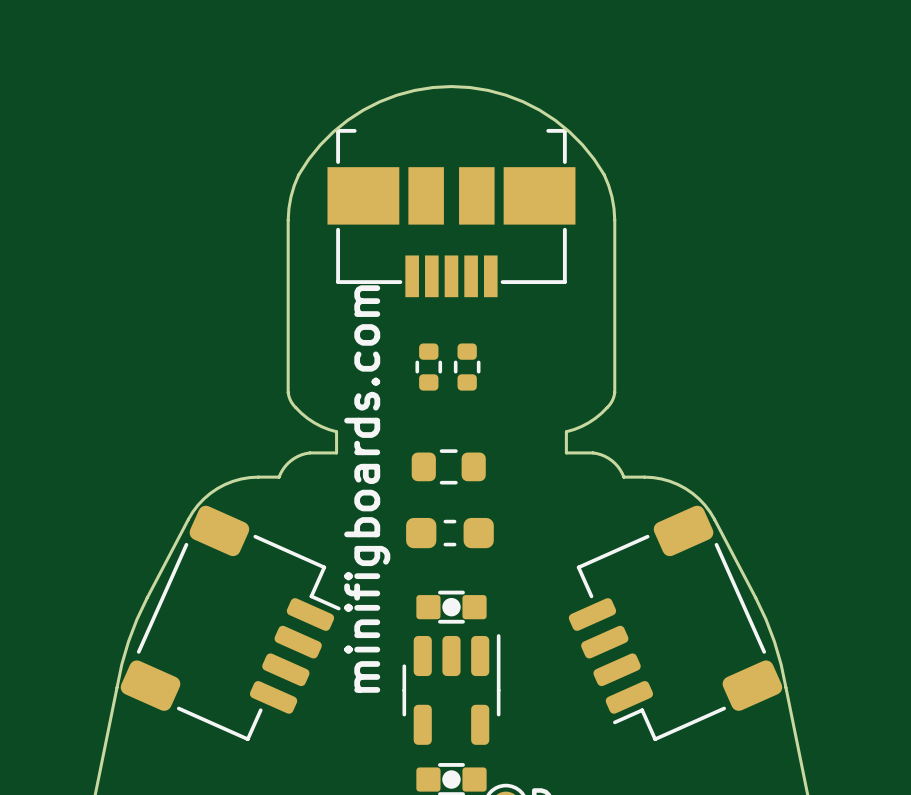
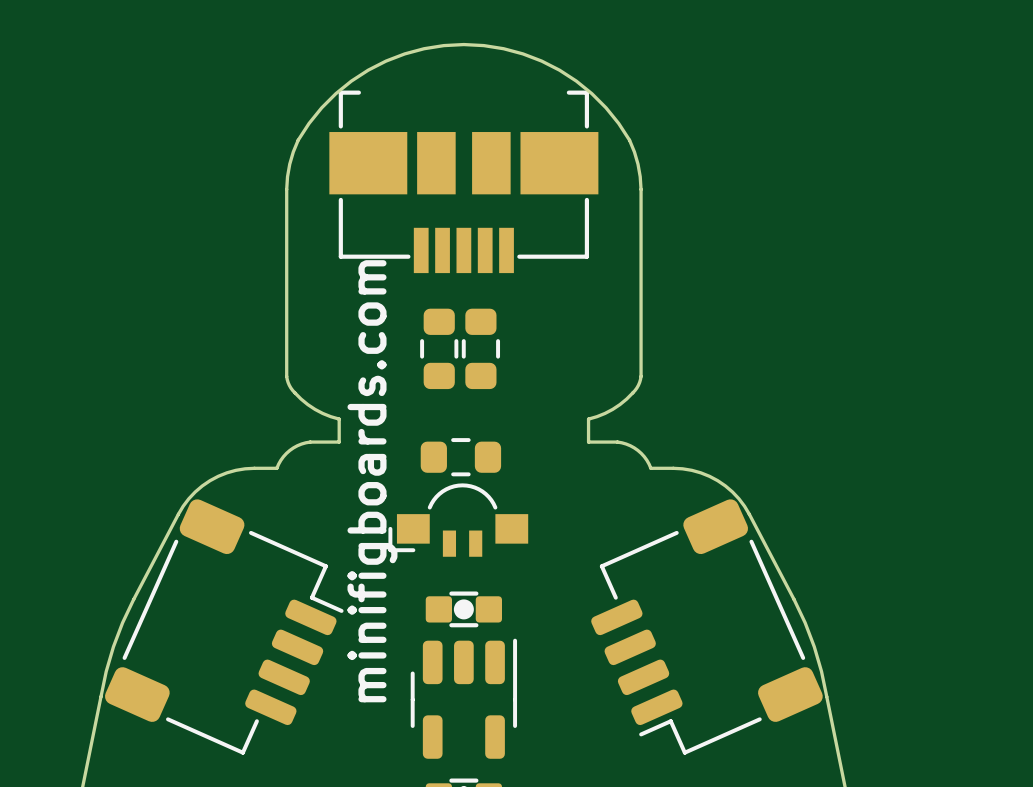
part footprint: [415, 343, 443, 391] -> [420, 308, 459, 390]
part footprint: [453, 343, 481, 391] -> [461, 308, 501, 390]
part footprint: [406, 517, 494, 549] -> [388, 483, 529, 557]

